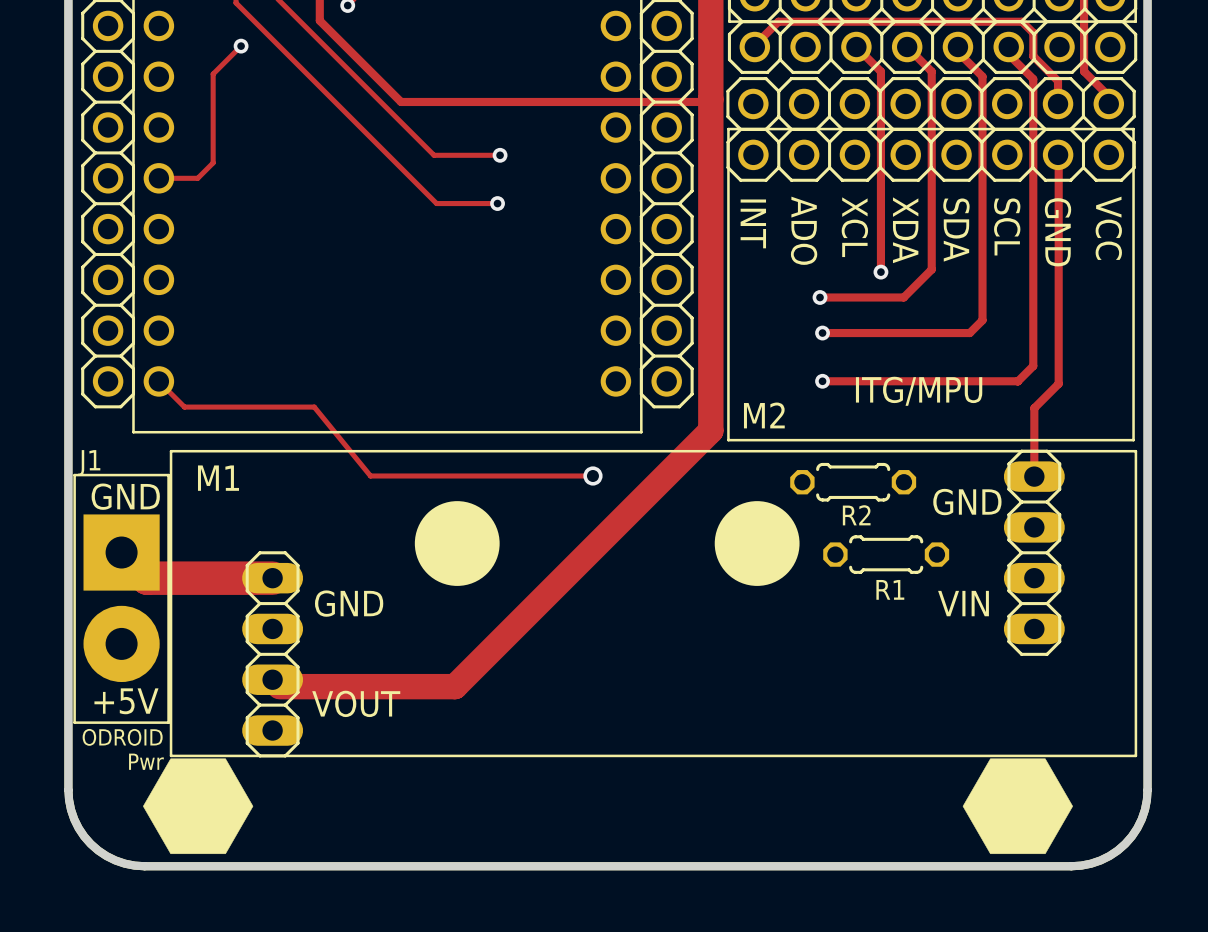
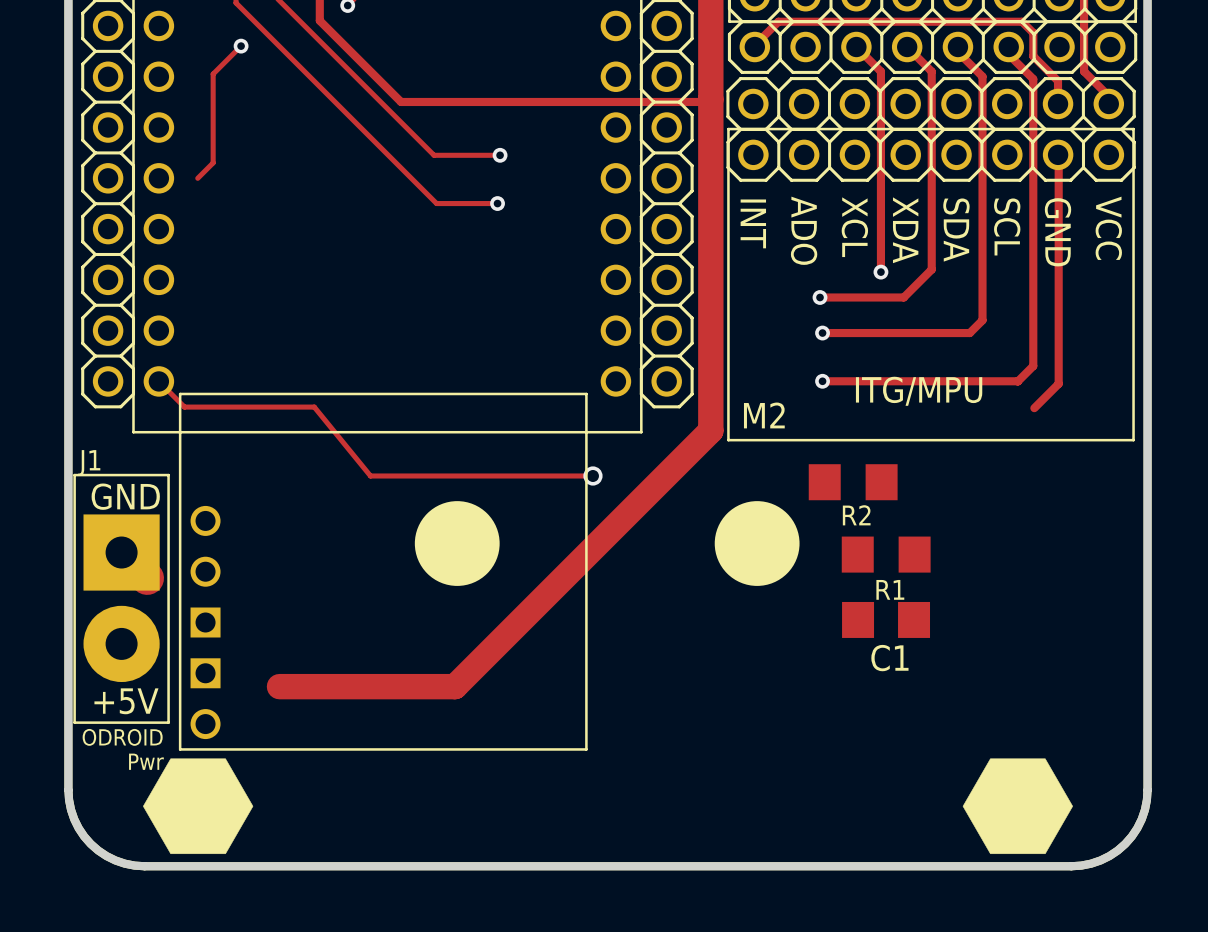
track: (158, 178) (197, 178) -> none
track: (1034, 408) (1034, 476) -> none
R2 footprint: [790, 462, 917, 502] -> [808, 464, 898, 501]
R1 footprint: [823, 535, 950, 574] -> [841, 536, 931, 573]
part: none -> (383, 571)
track: (147, 578) (272, 578) -> none
M1: (653, 603) -> none
C1: none -> (886, 619)

